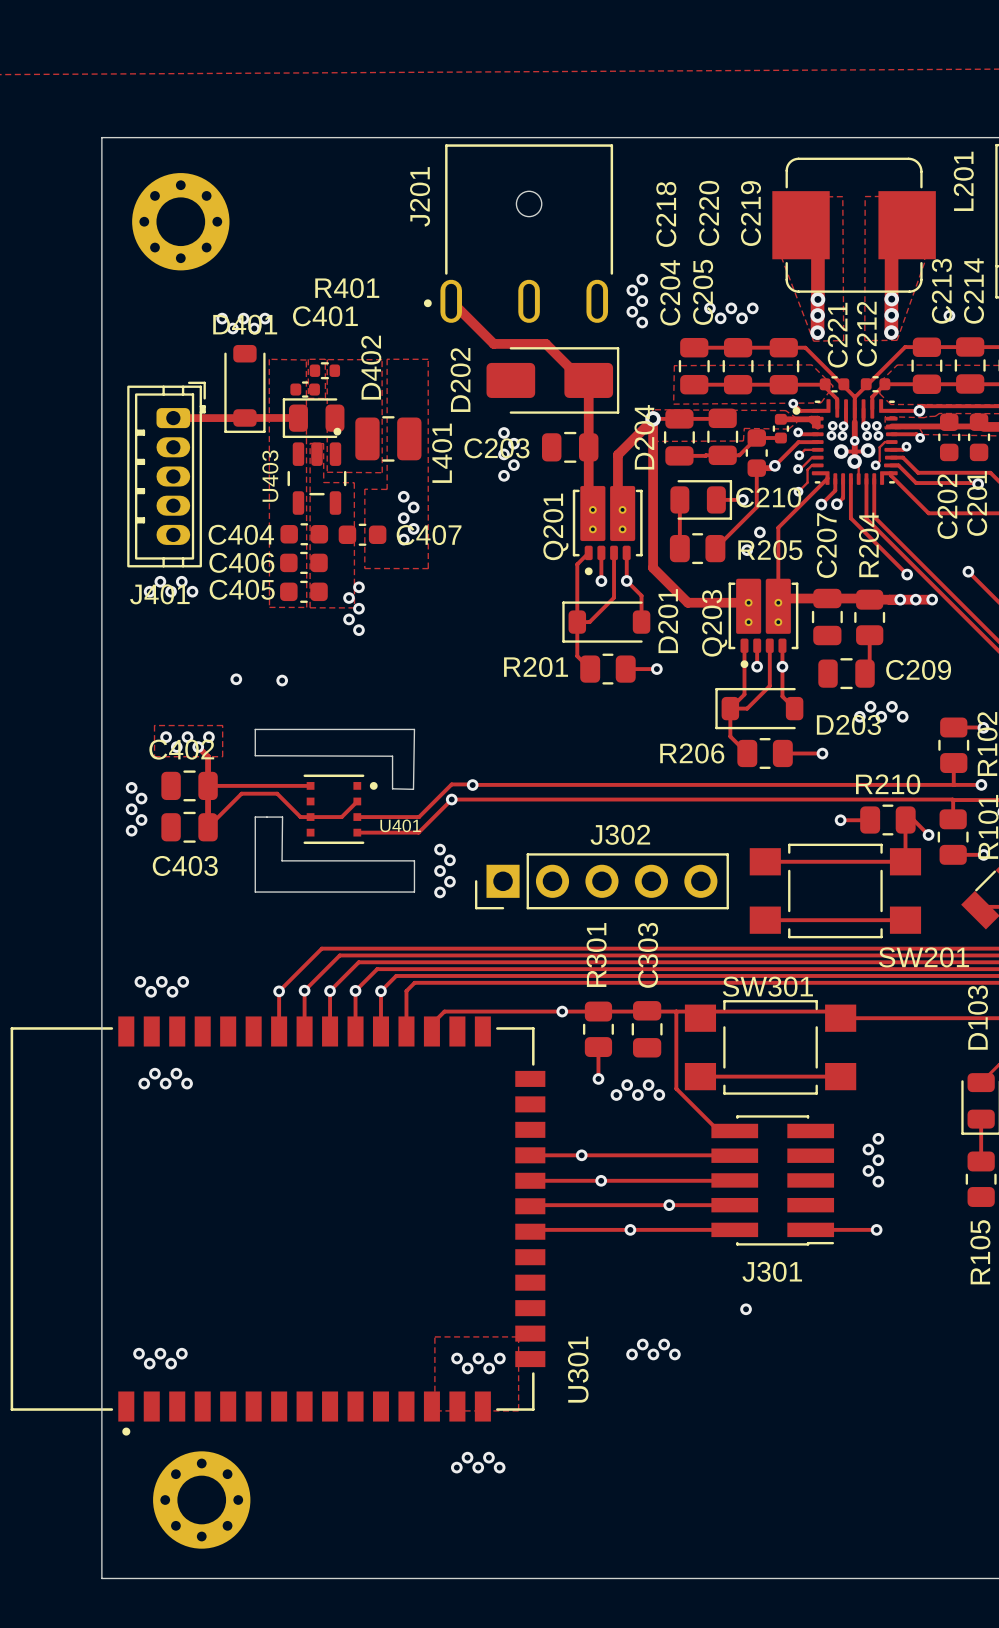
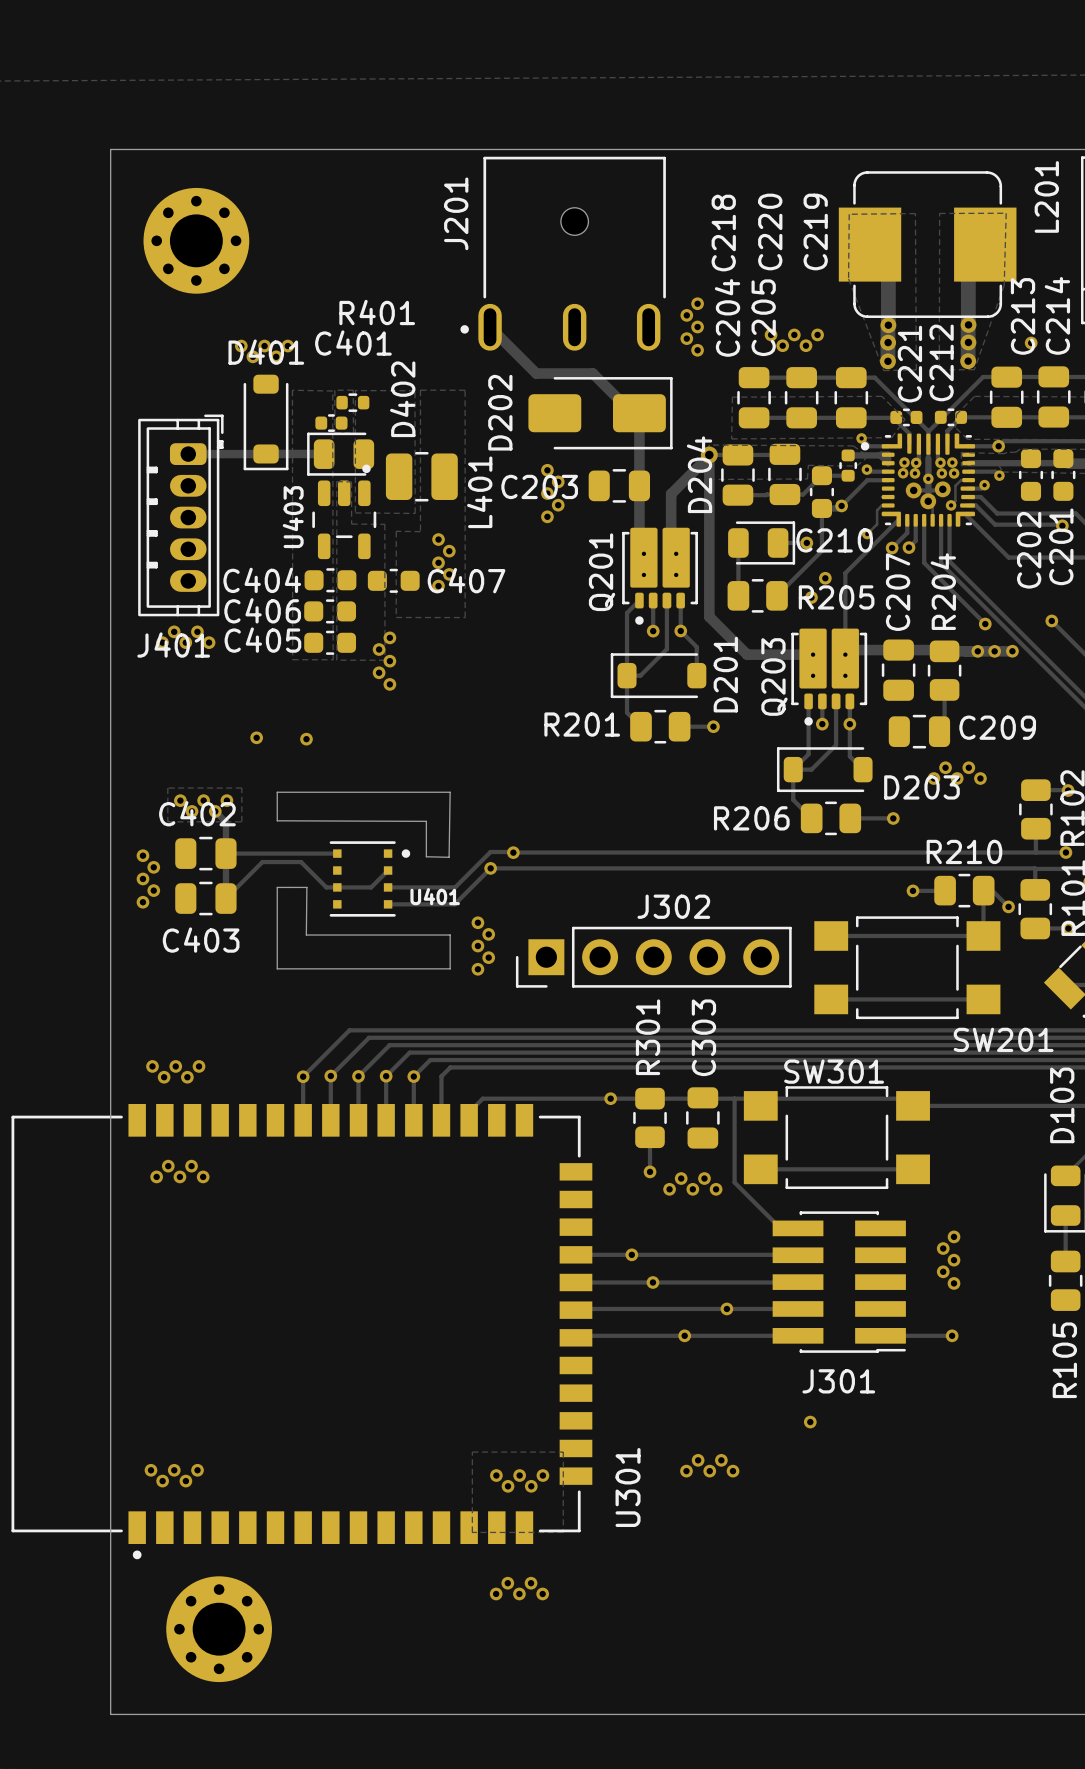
track: (817, 449) (804, 449) (799, 455) -> none
via: (799, 455) -> none
track: (811, 457) (800, 469) (798, 469) -> none
via: (798, 469) -> none

